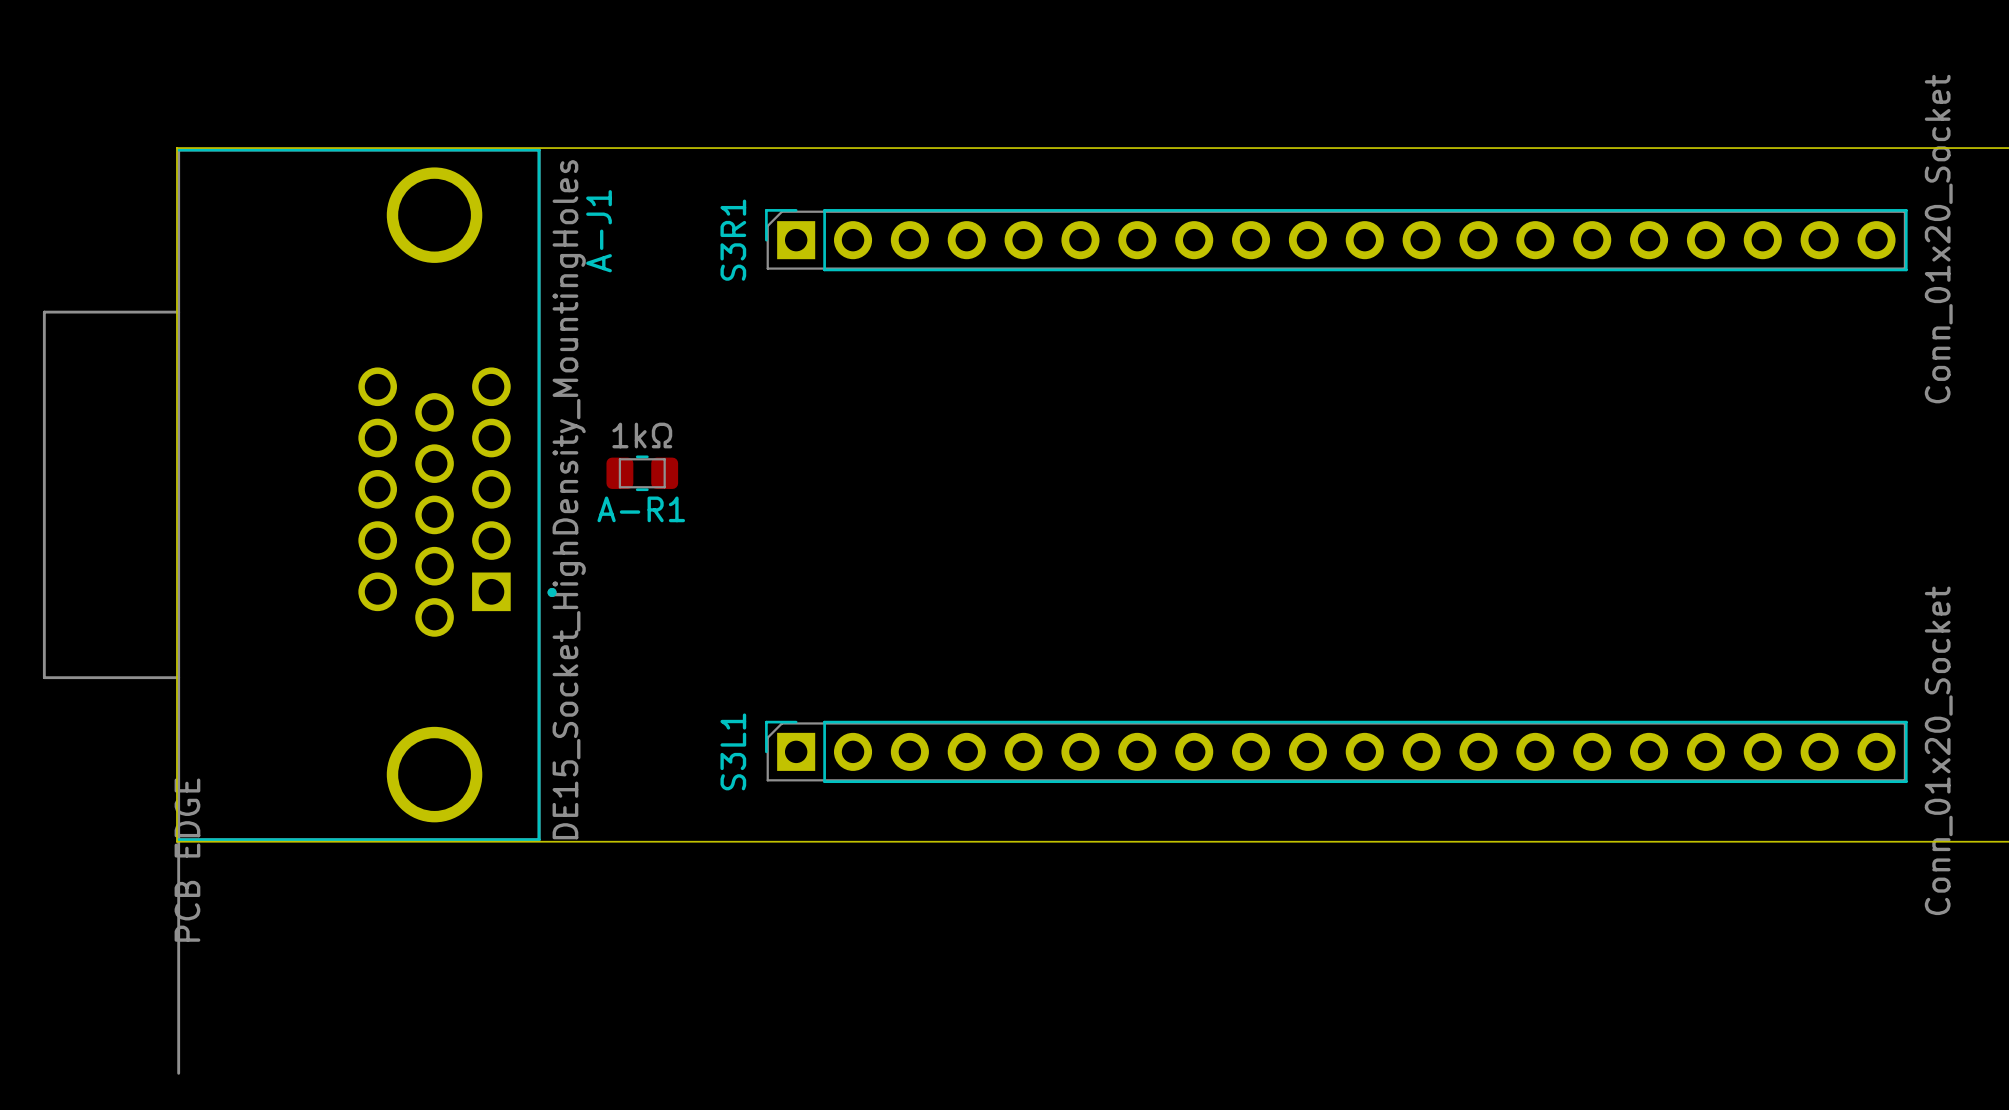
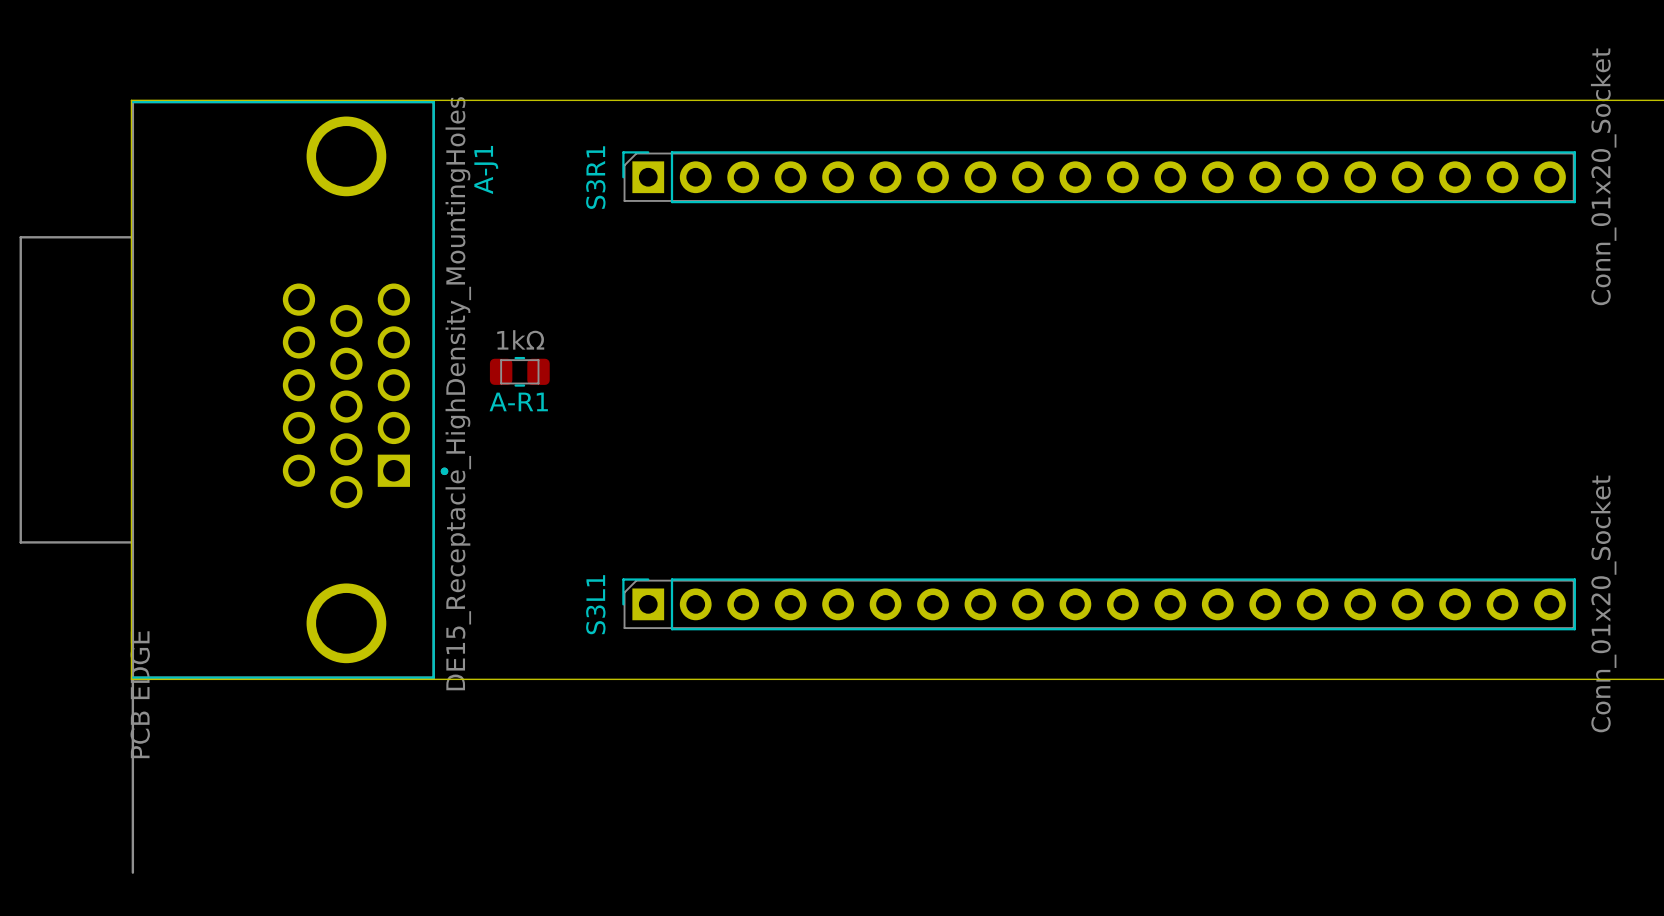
A-J1 value: DE15_Socket_HighDensity_MountingHoles (569, 499) -> DE15_Receptacle_HighDensity_MountingHoles (458, 393)

